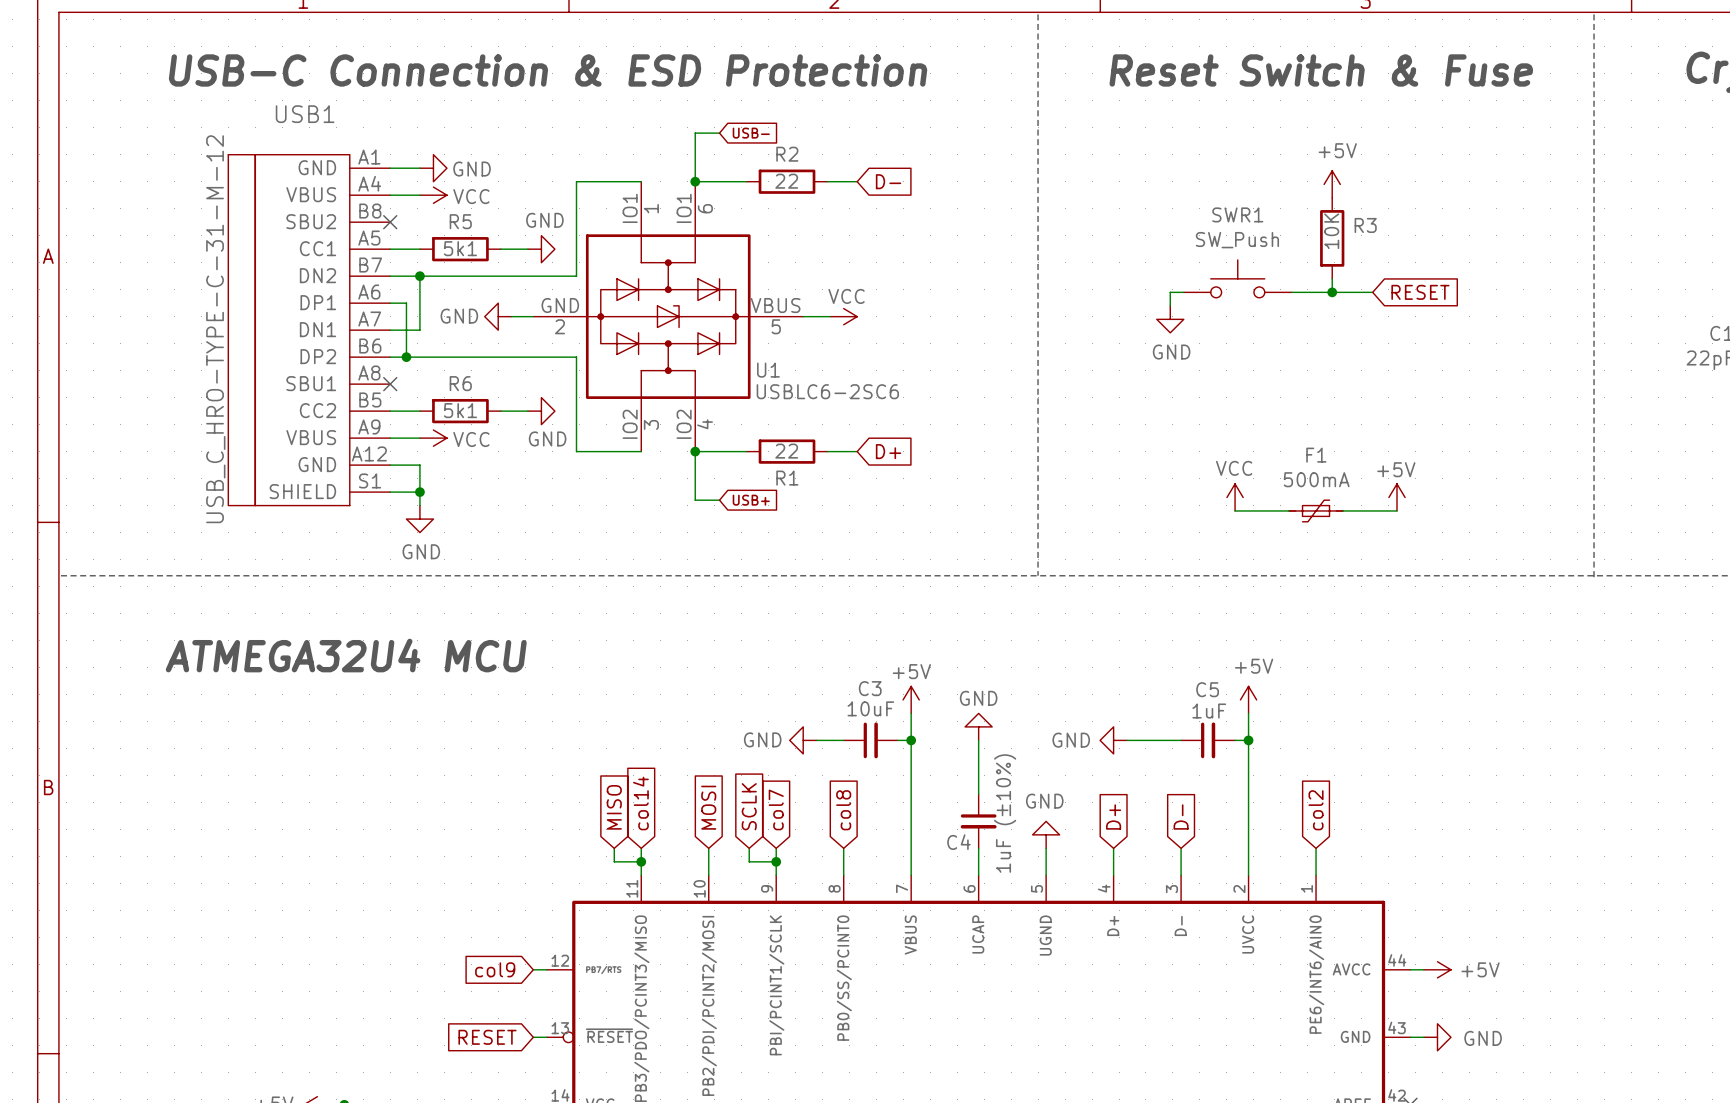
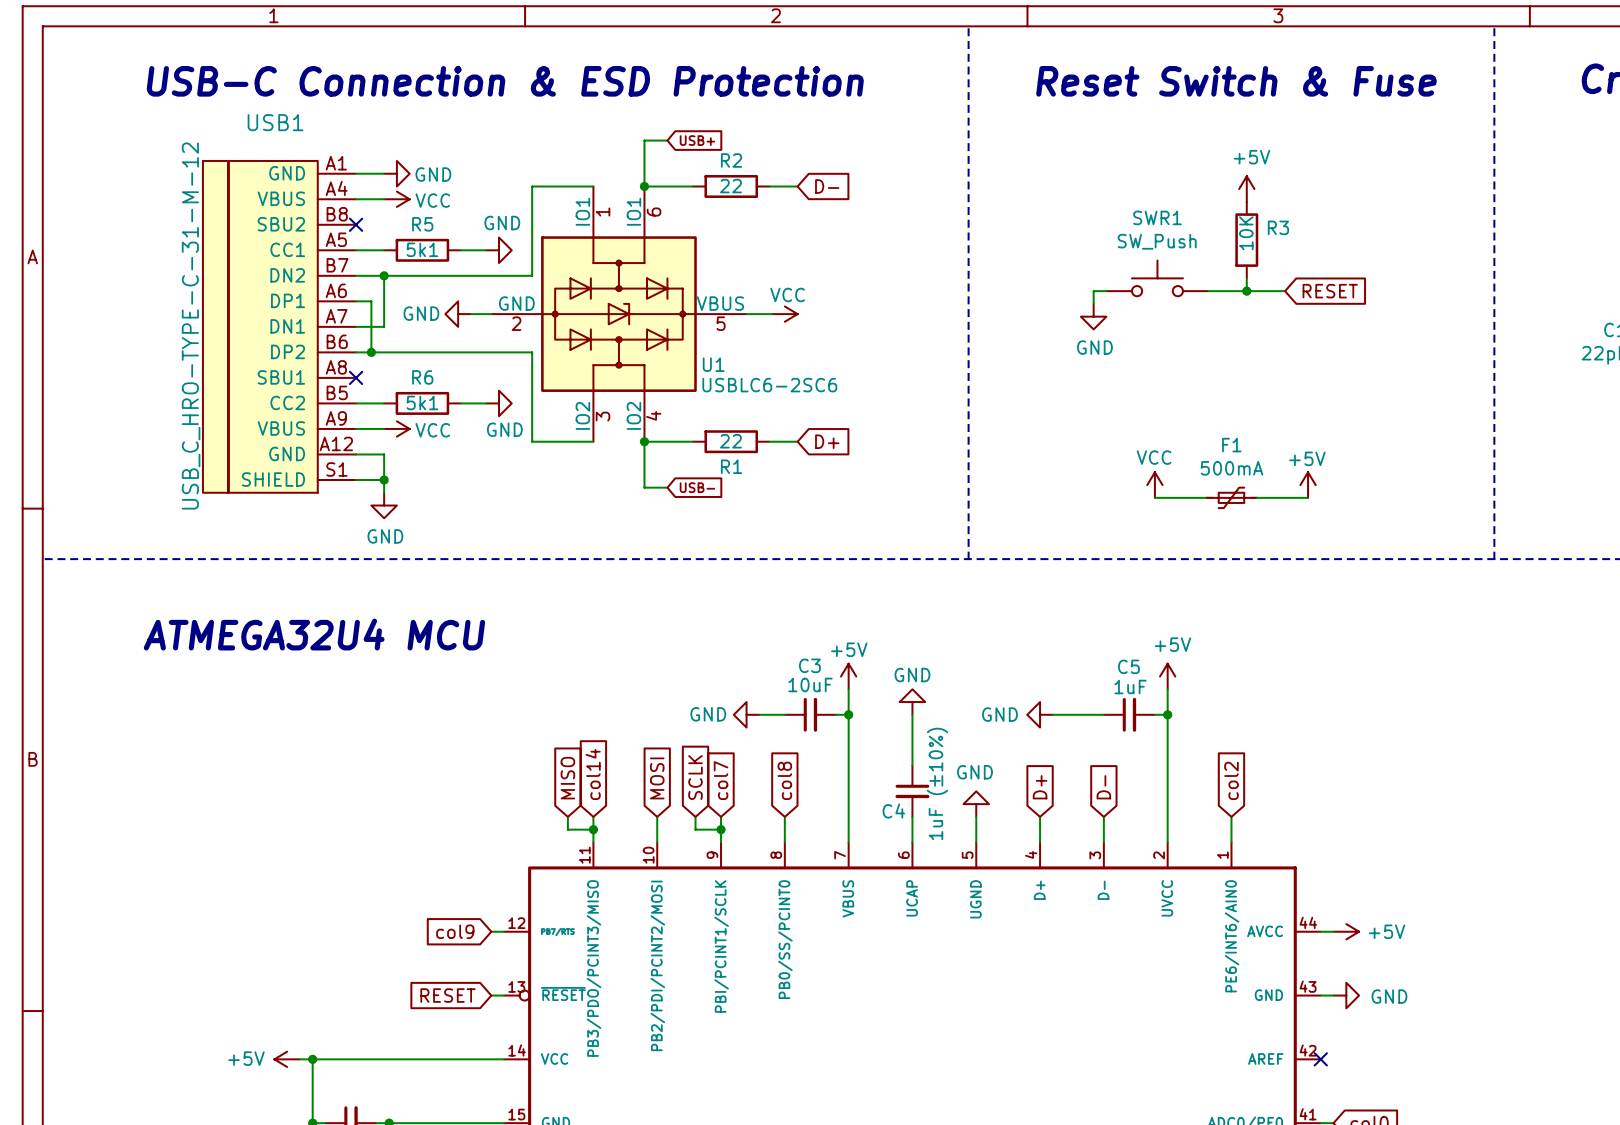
global label: USB- (751, 133) -> USB+ (697, 140)
global label: USB+ (751, 500) -> USB- (697, 487)

